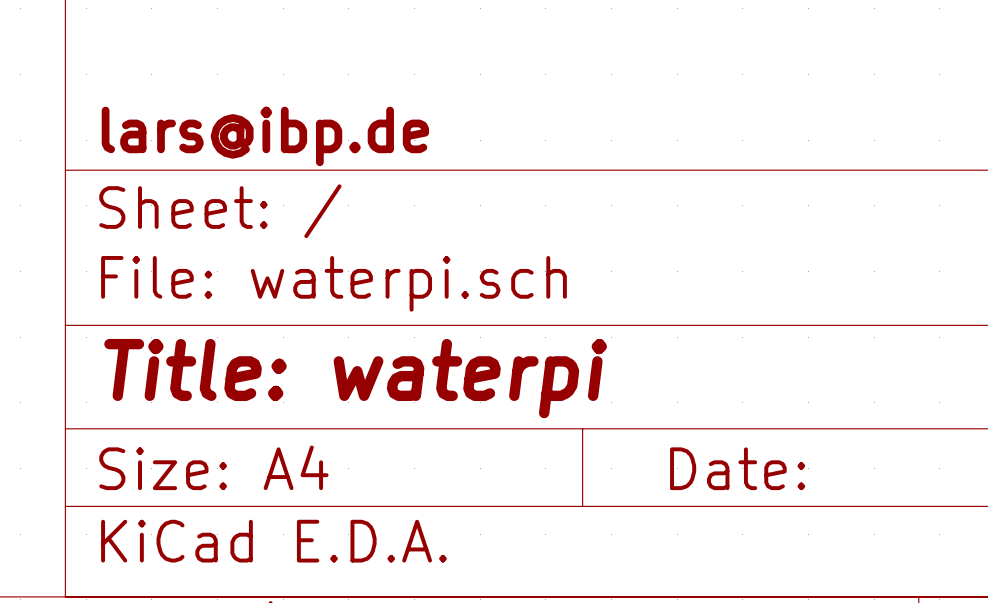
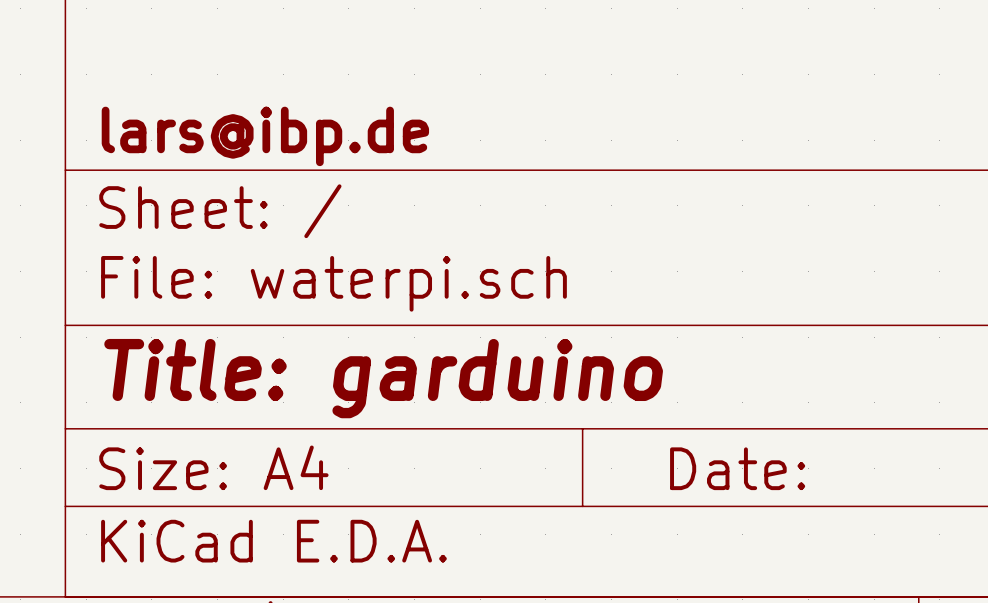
title block: Title: waterpi (355, 378) -> Title: garduino (383, 378)

